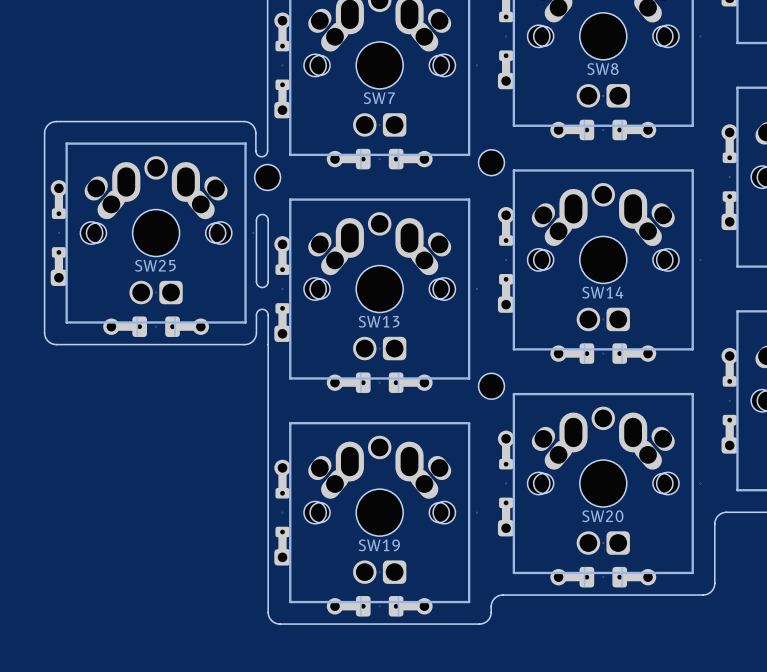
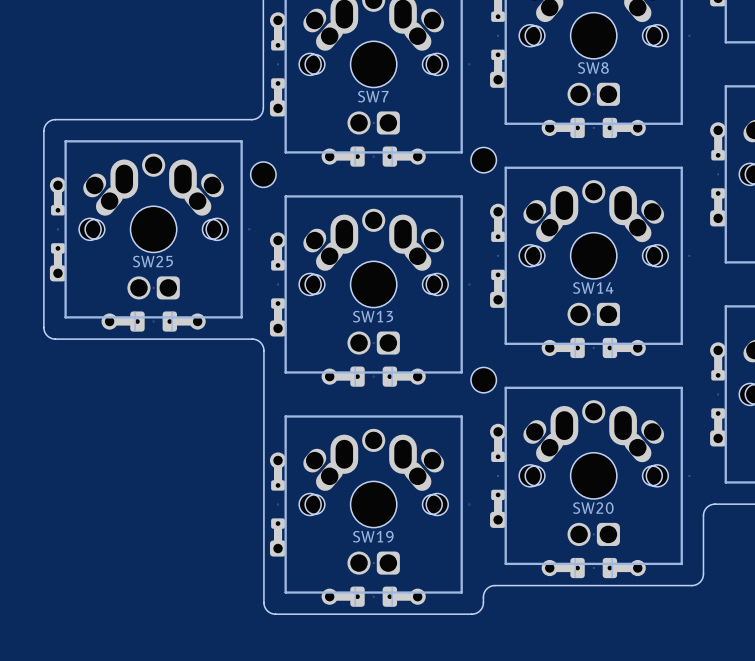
board edge: (267, 109) (267, 150) (264, 155) (260, 156) (256, 153) (254, 128) (251, 123) (244, 121) -> (263, 108) (261, 113) (257, 118) (240, 119)
board edge: (256, 220) (256, 282) (258, 286) (263, 287) (268, 282) (268, 219) (265, 215) (261, 214) (256, 220) -> none
board edge: (244, 344) (251, 342) (255, 337) (257, 312) (260, 309) (265, 310) (268, 315) (268, 356) -> (240, 339) (258, 340) (262, 344) (263, 350)

